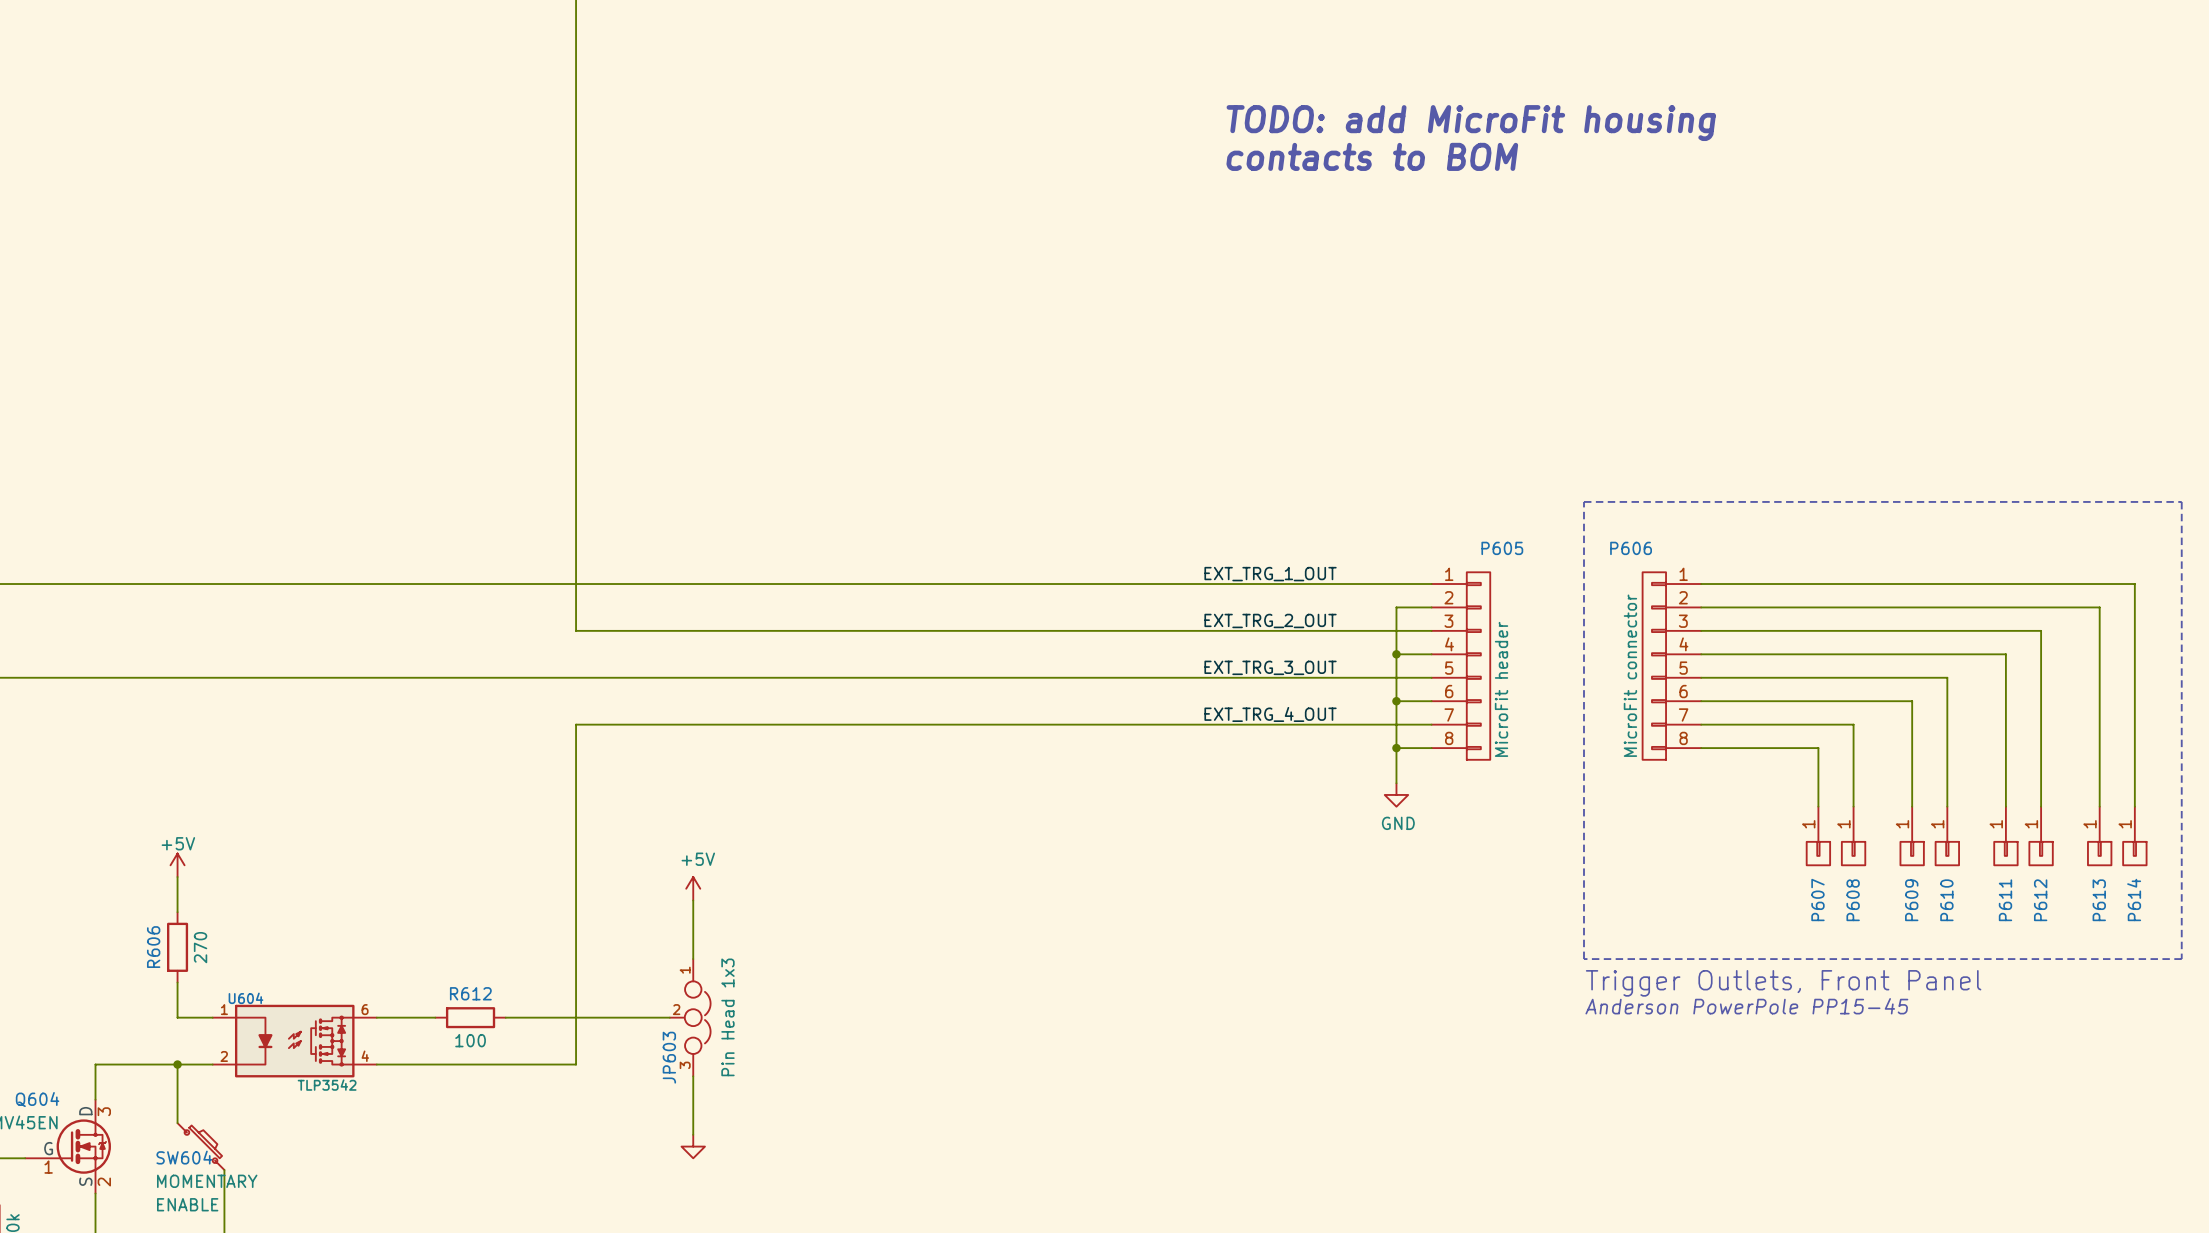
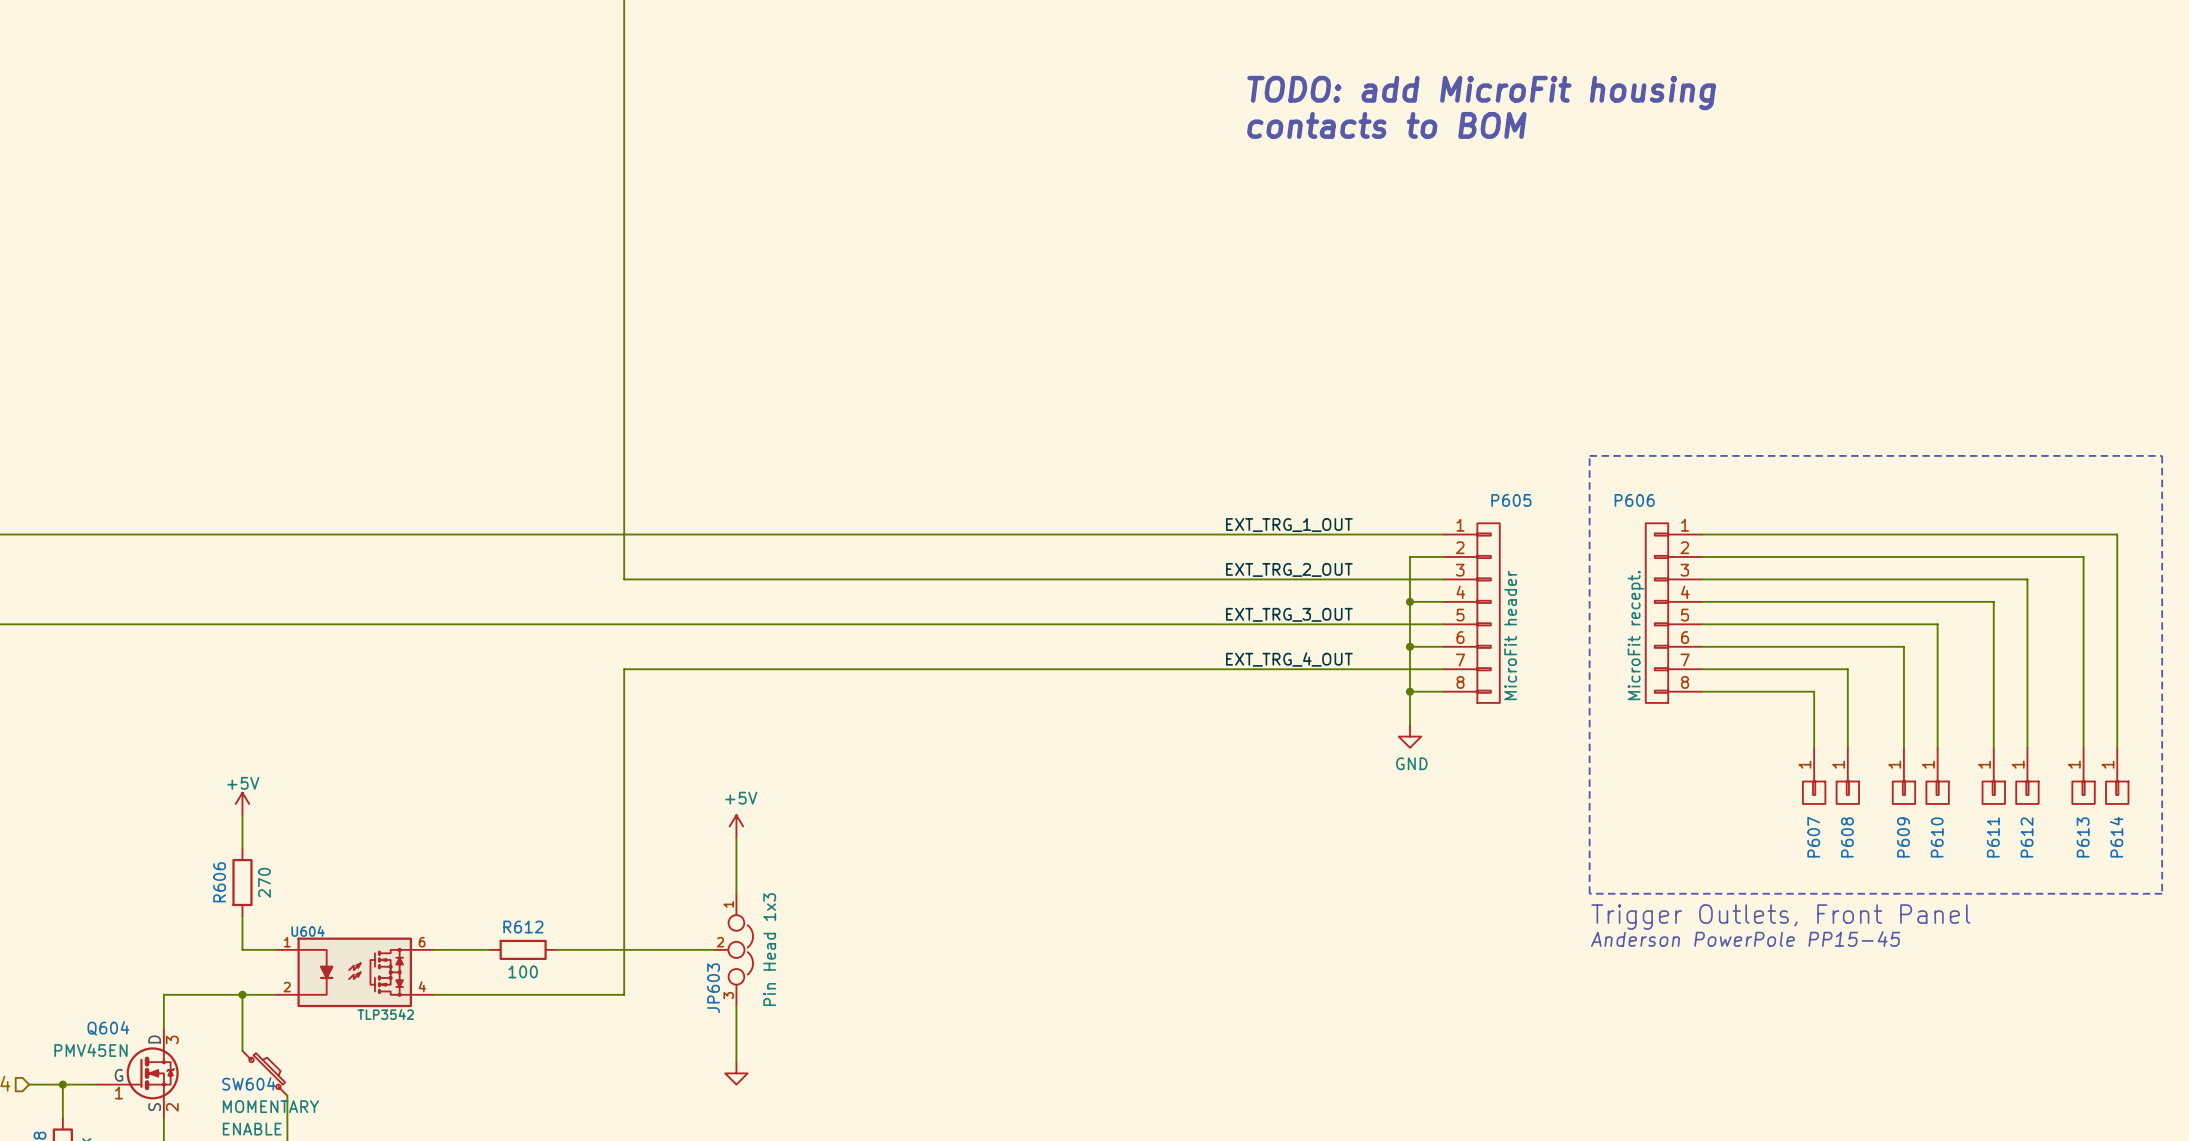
P606 value: MicroFit connector (1630, 675) -> MicroFit recept. (1635, 635)

